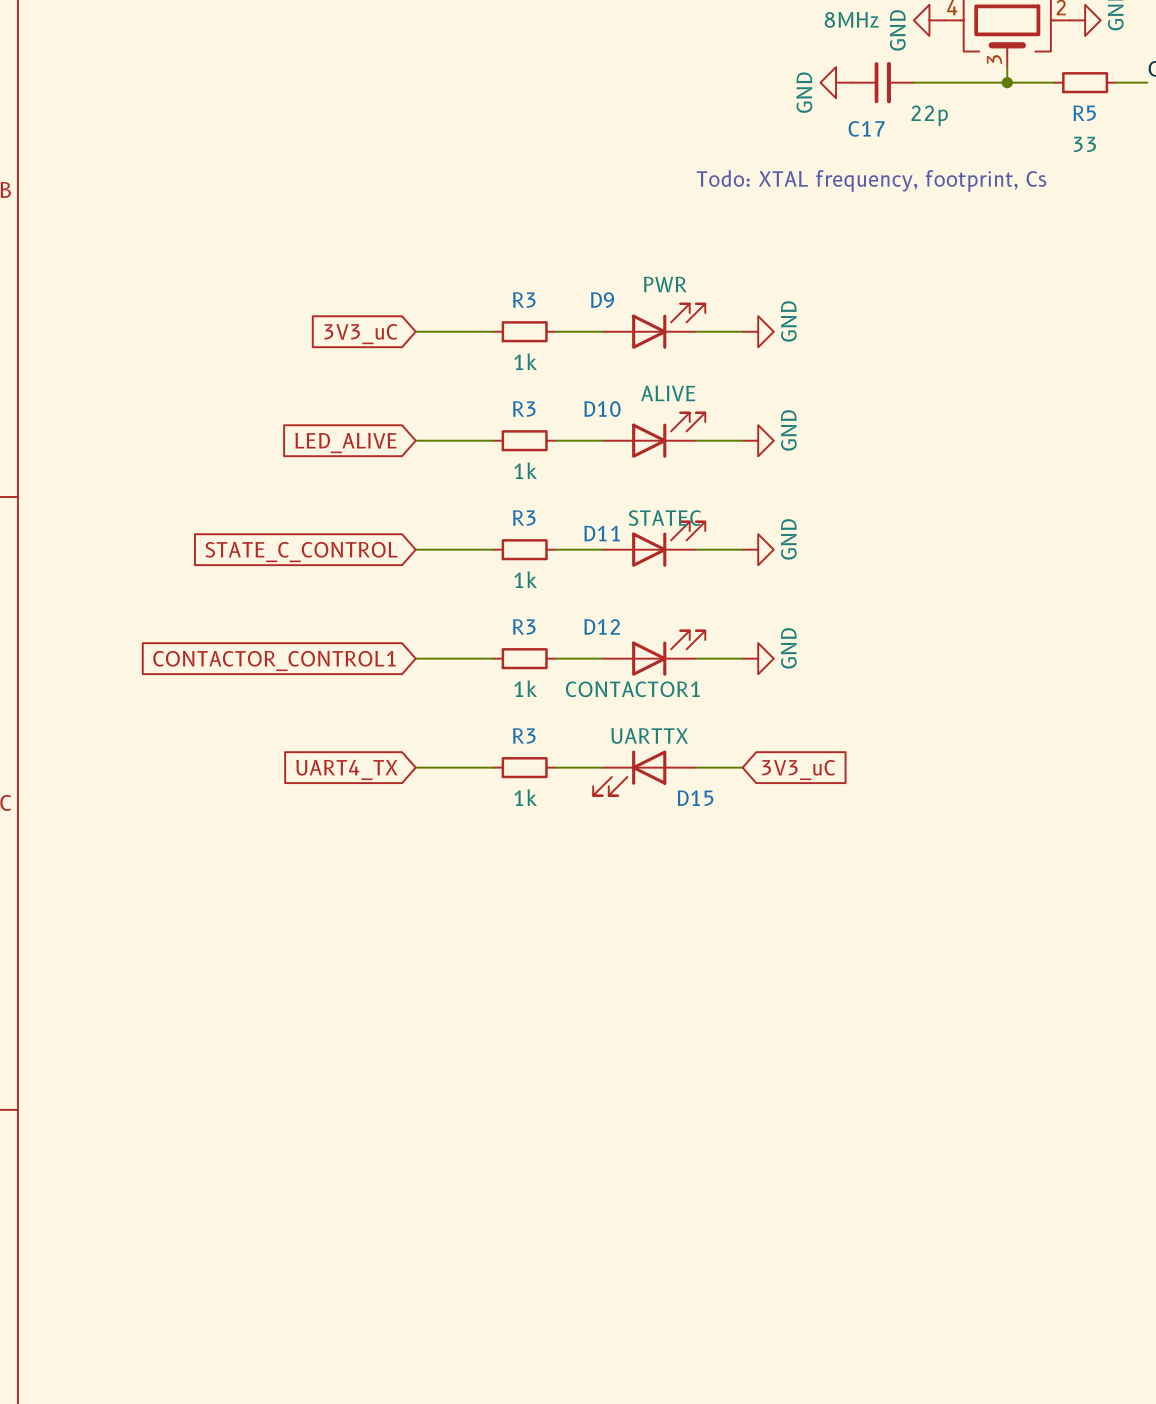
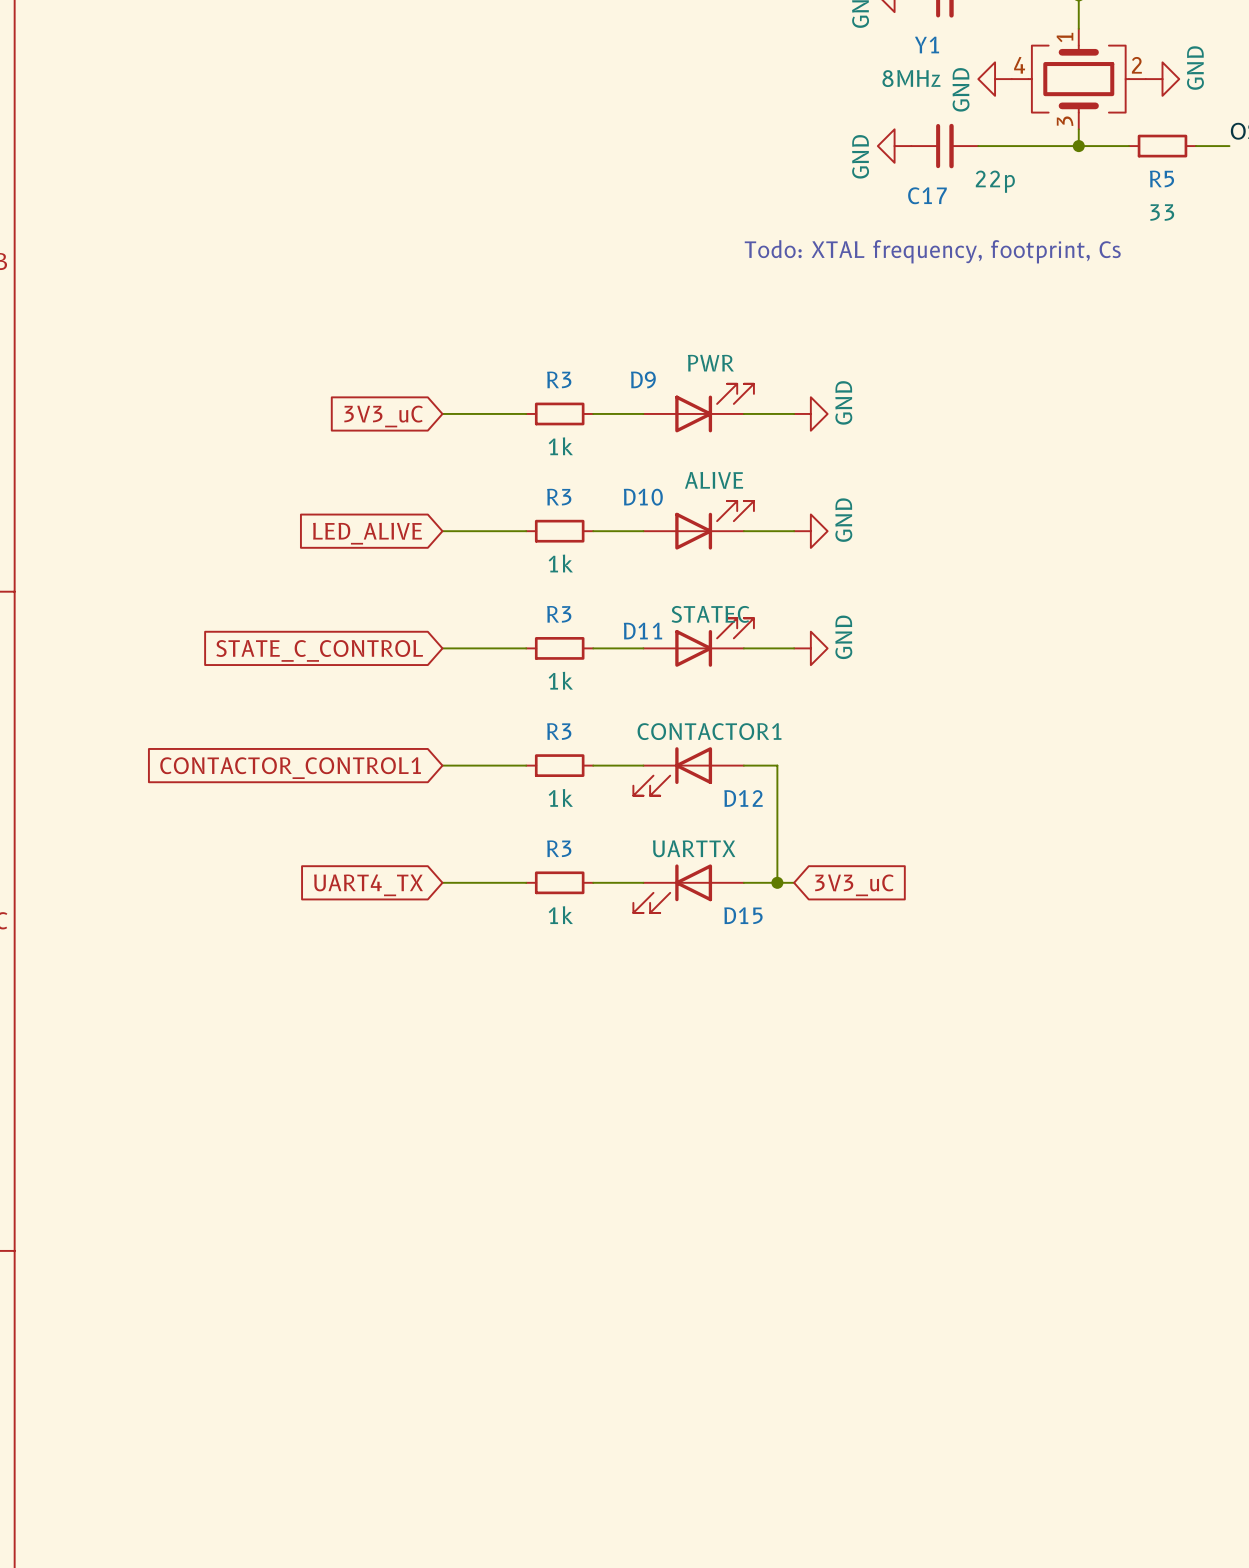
D12 rotation: 0° (668, 653) -> 180° (672, 771)
wire: (727, 658) (742, 658) -> (777, 765) (777, 882)
power symbol: GND (758, 658) -> none
junction: none -> (777, 882)

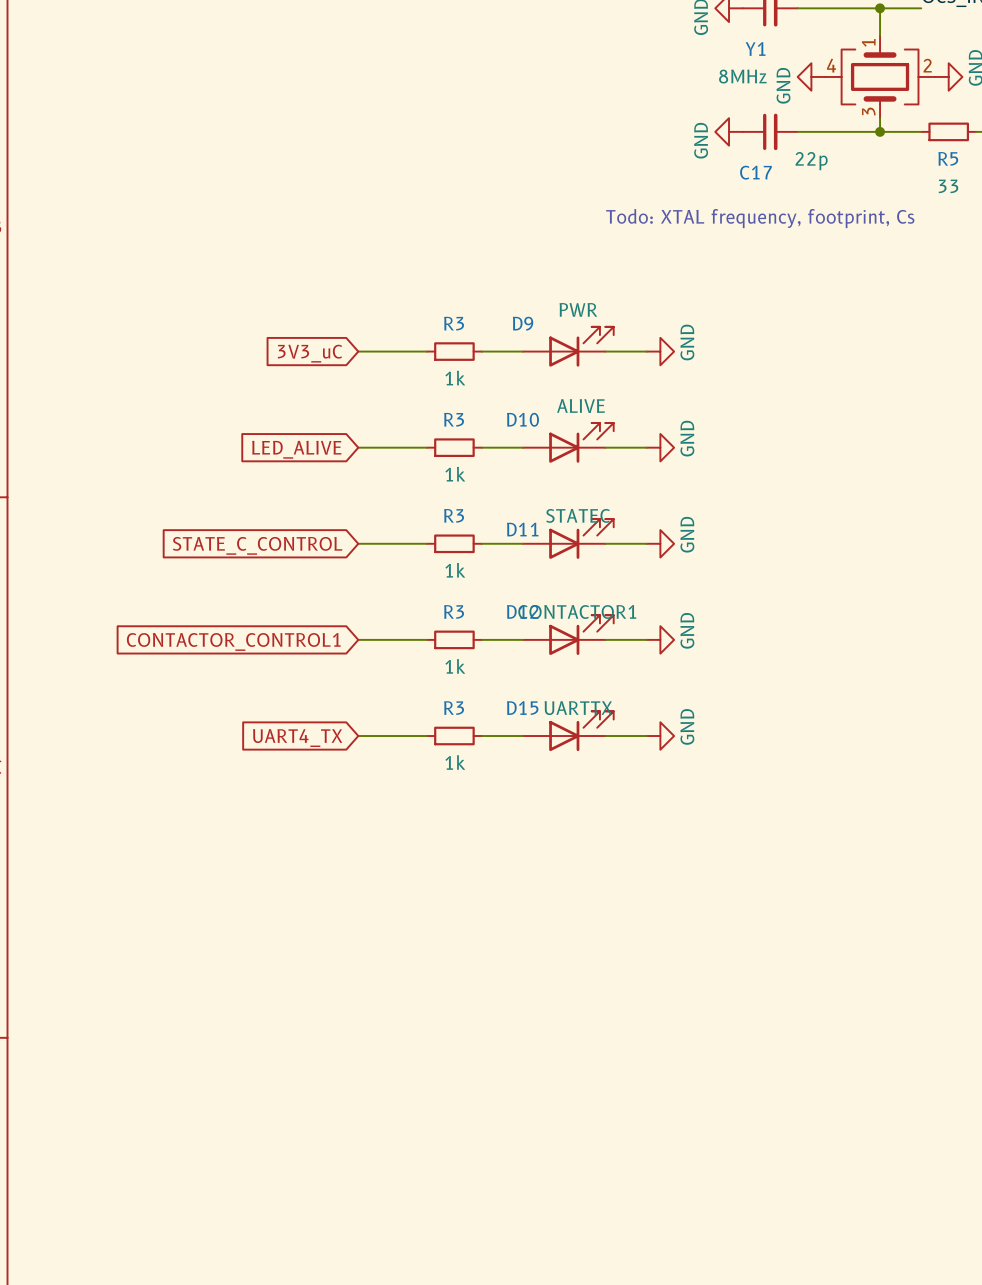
wire: (777, 765) (777, 882) -> (632, 639) (646, 639)
power symbol: none -> GND (660, 639)
D12 rotation: 0° (672, 771) -> 180° (581, 635)
junction: (777, 882) -> none
power symbol: none -> GND (660, 736)
global label: 3V3_uC (854, 885) -> none
D15 rotation: 0° (672, 888) -> 180° (581, 731)

